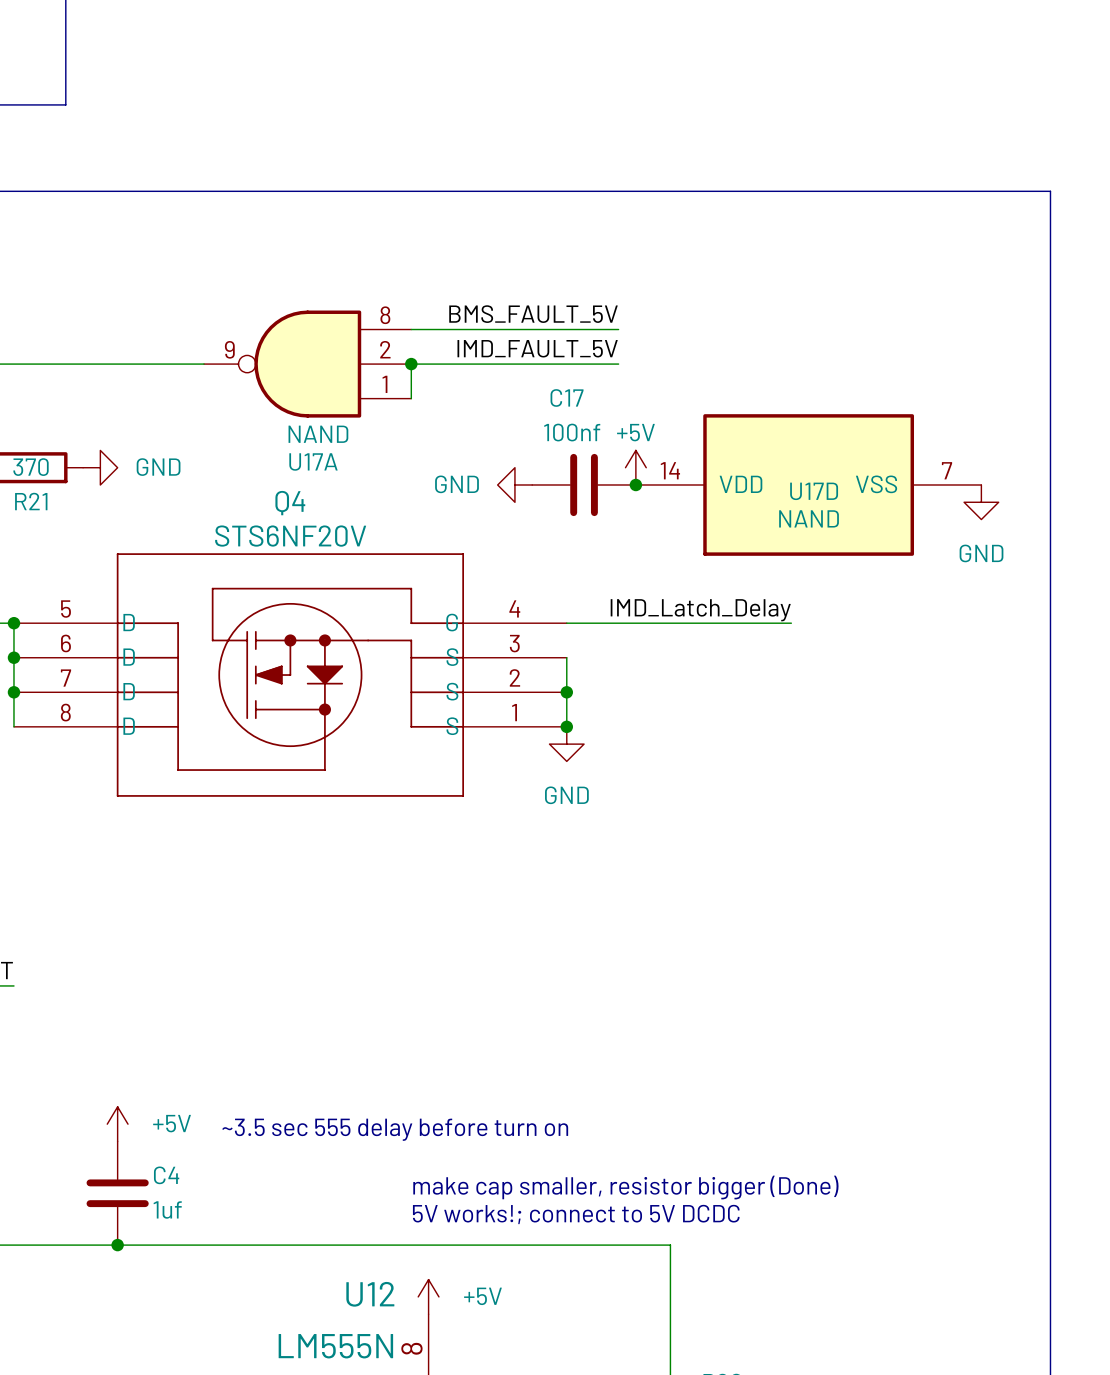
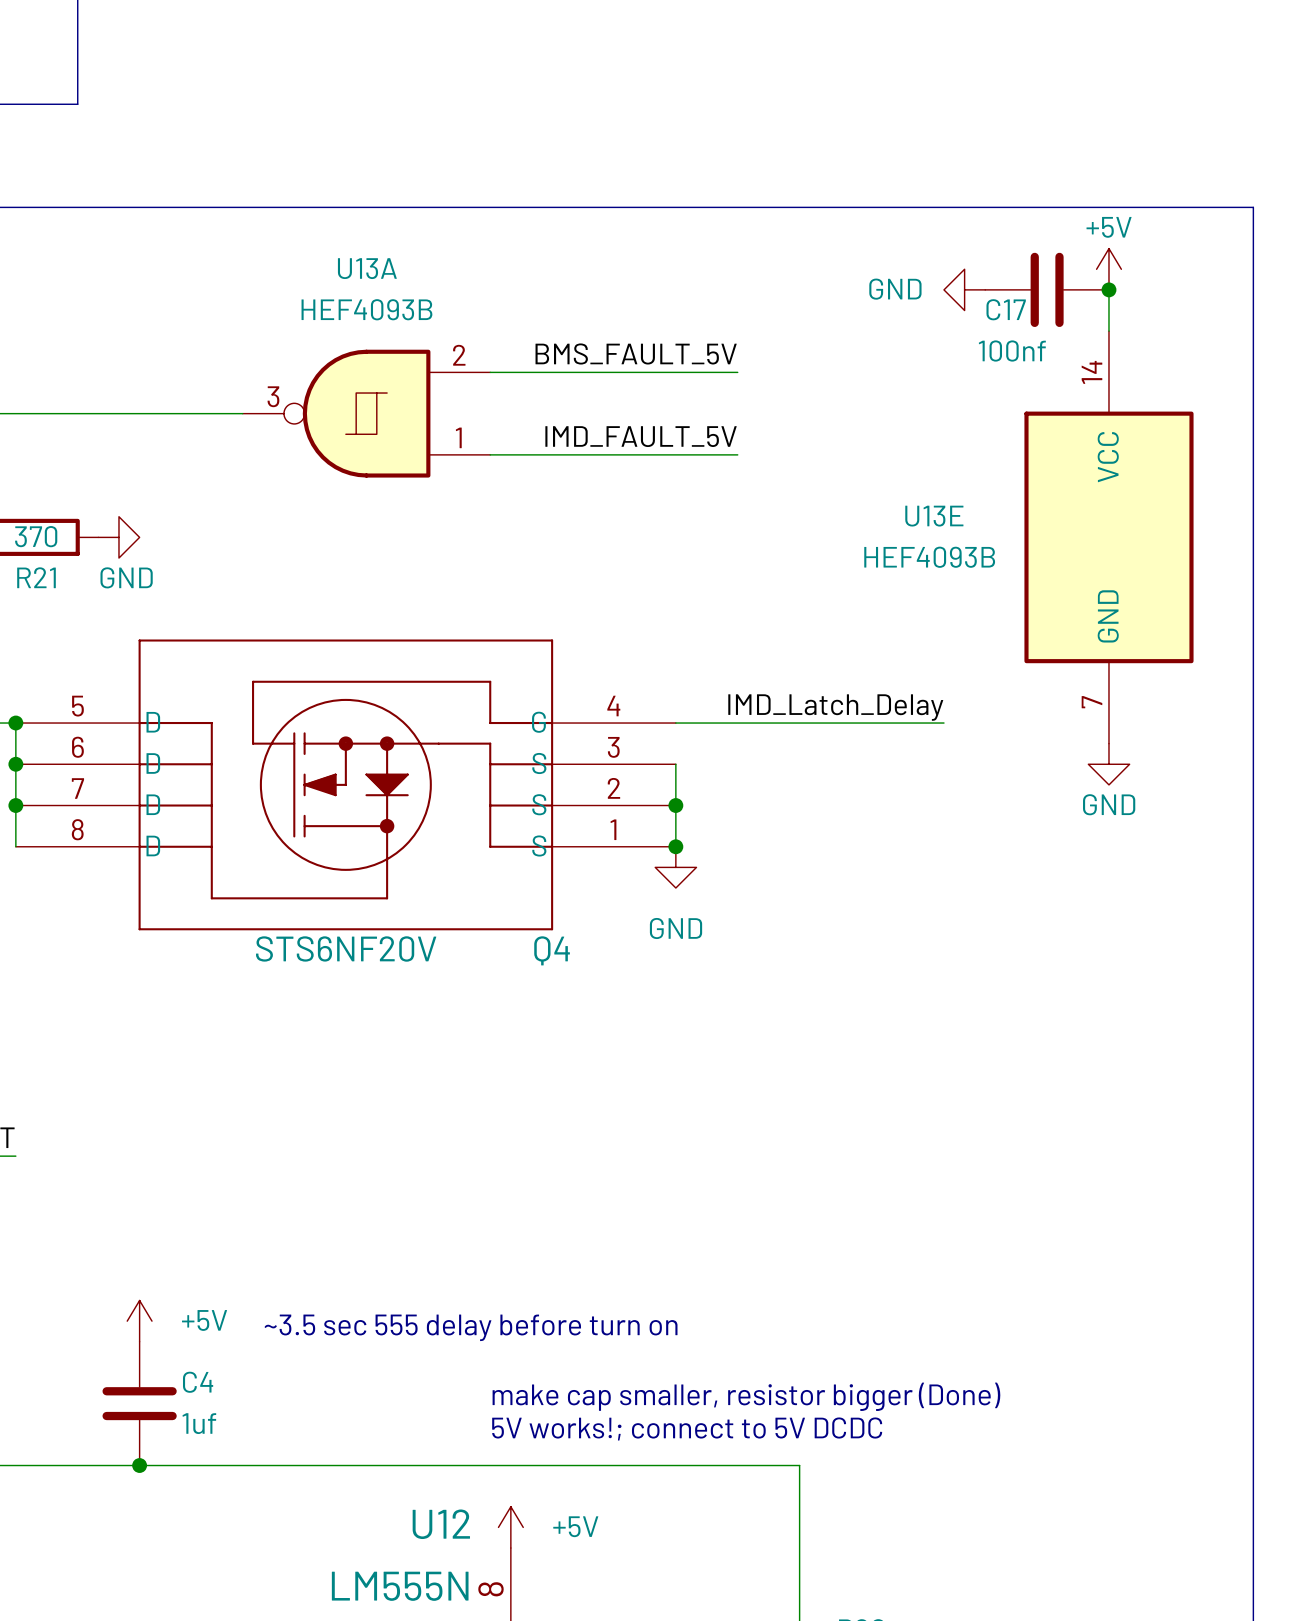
power symbol: none -> +5V (1108, 269)
power symbol: none -> GND (964, 289)
wire: none -> (1108, 289) (1108, 331)
junction: none -> (1108, 289)
label position: IMD_FAULT_5V (537, 348) -> IMD_FAULT_5V (641, 436)
U17A: NAND (307, 364) -> none
U13A: none -> HEF4093B (366, 413)
junction: (411, 364) -> none
wire: (618, 364) (411, 364) (411, 398) -> (737, 454) (490, 454)
C17 name position: C17 (567, 397) -> C17 (1006, 309)
C17 value position: 100nf (572, 432) -> 100nf (1012, 351)
power symbol text position: GND (158, 467) -> GND (126, 577)
power symbol: +5V (635, 467) -> none
U13E: none -> HEF4093B (1108, 537)
power symbol: GND (514, 484) -> none
C17 position: (584, 484) -> (1047, 289)
junction: (635, 484) -> none
U17D: NAND (808, 484) -> none
power symbol: GND (981, 502) -> none
Q4 name position: Q4 (290, 503) -> Q4 (552, 950)
Q4 value position: STS6NF20V (290, 536) -> STS6NF20V (346, 948)
power symbol: none -> GND (1108, 764)

